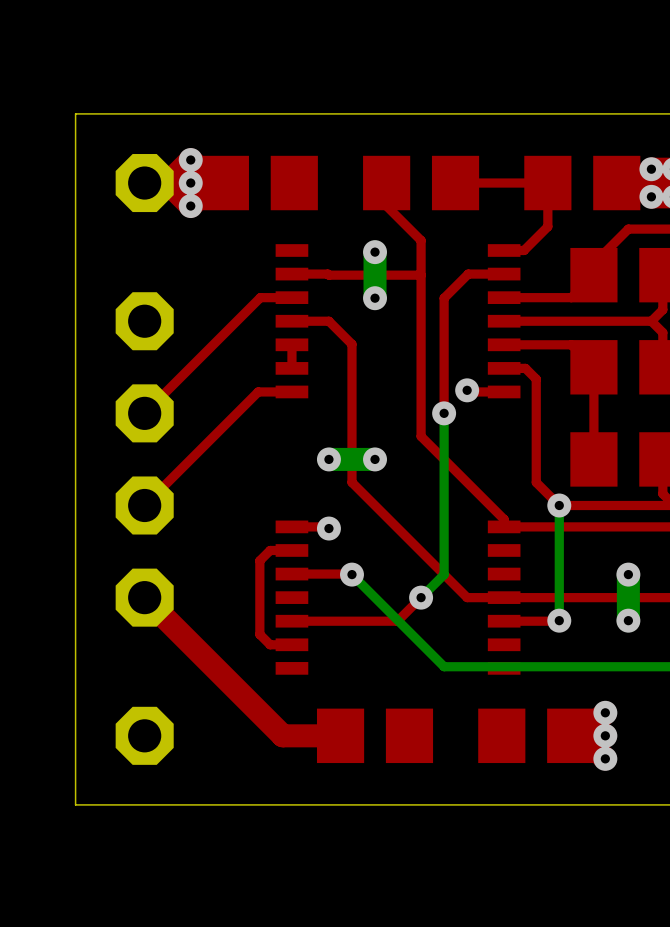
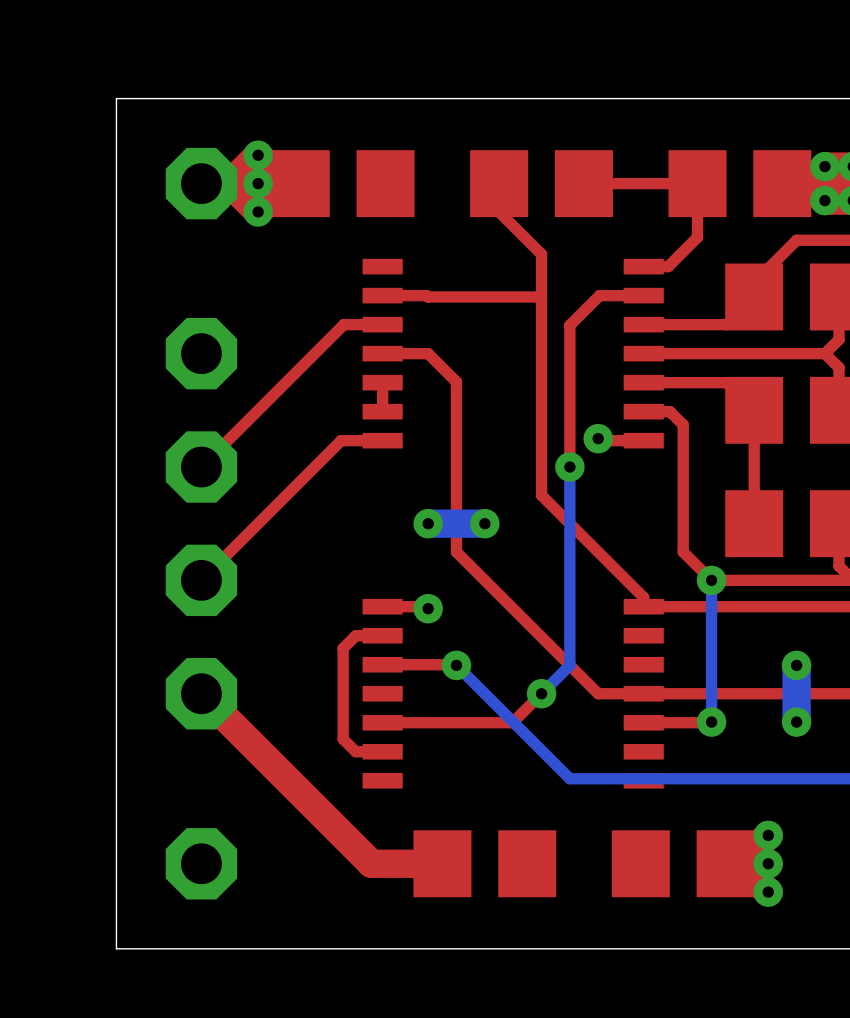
bottom track: (375, 252) (375, 298) -> none
via: (375, 252) -> none
via: (375, 298) -> none

